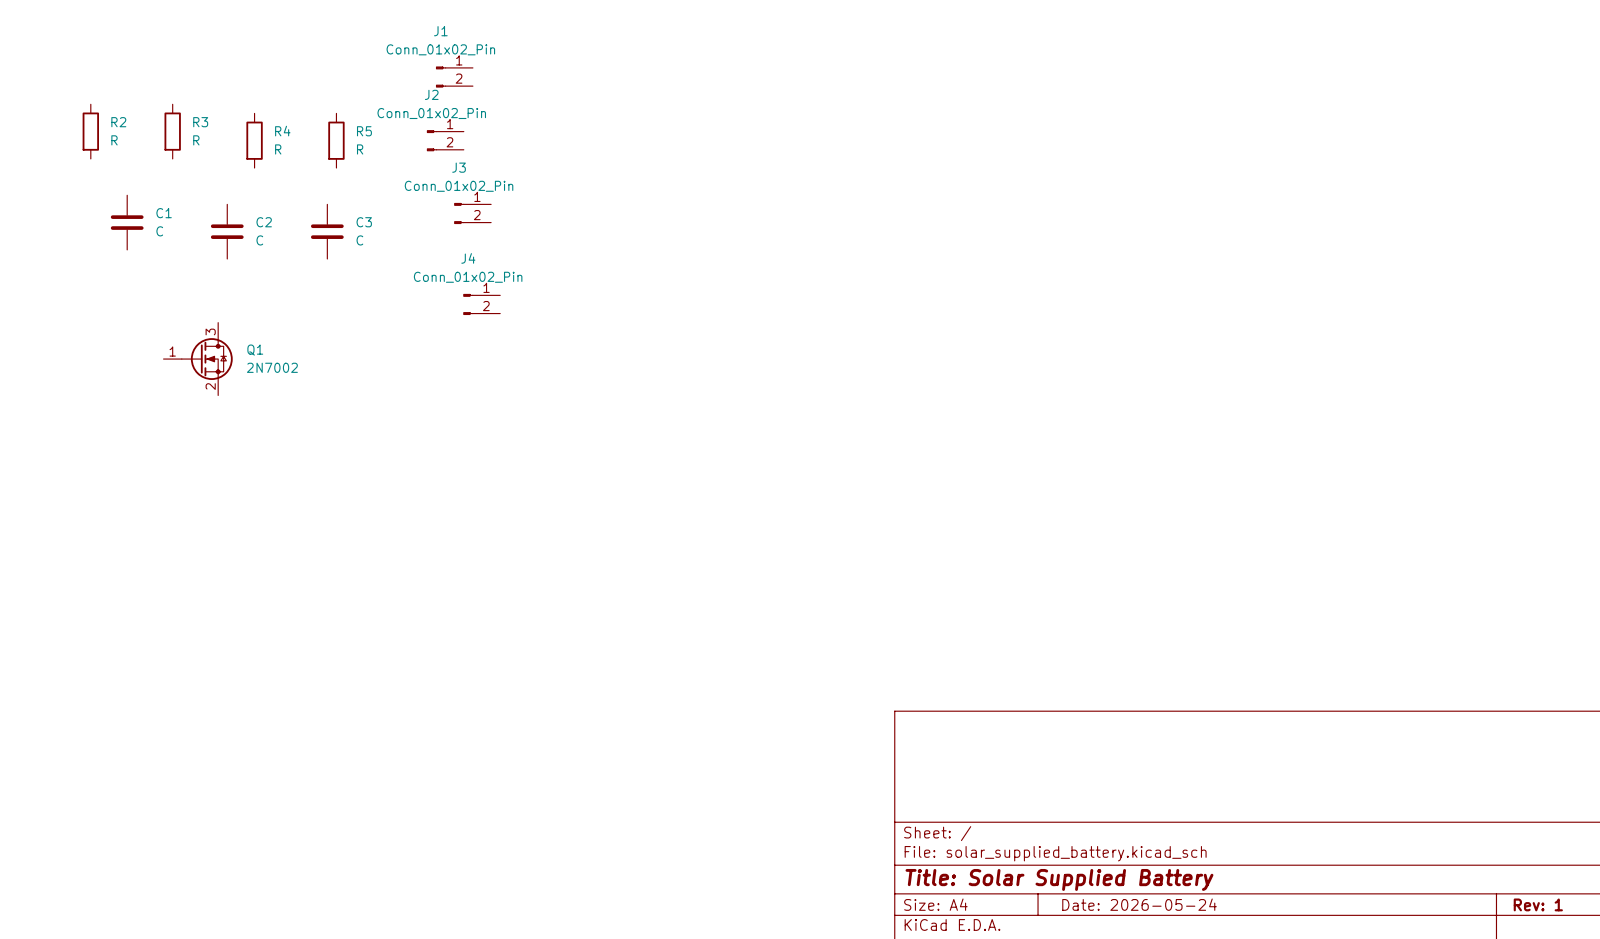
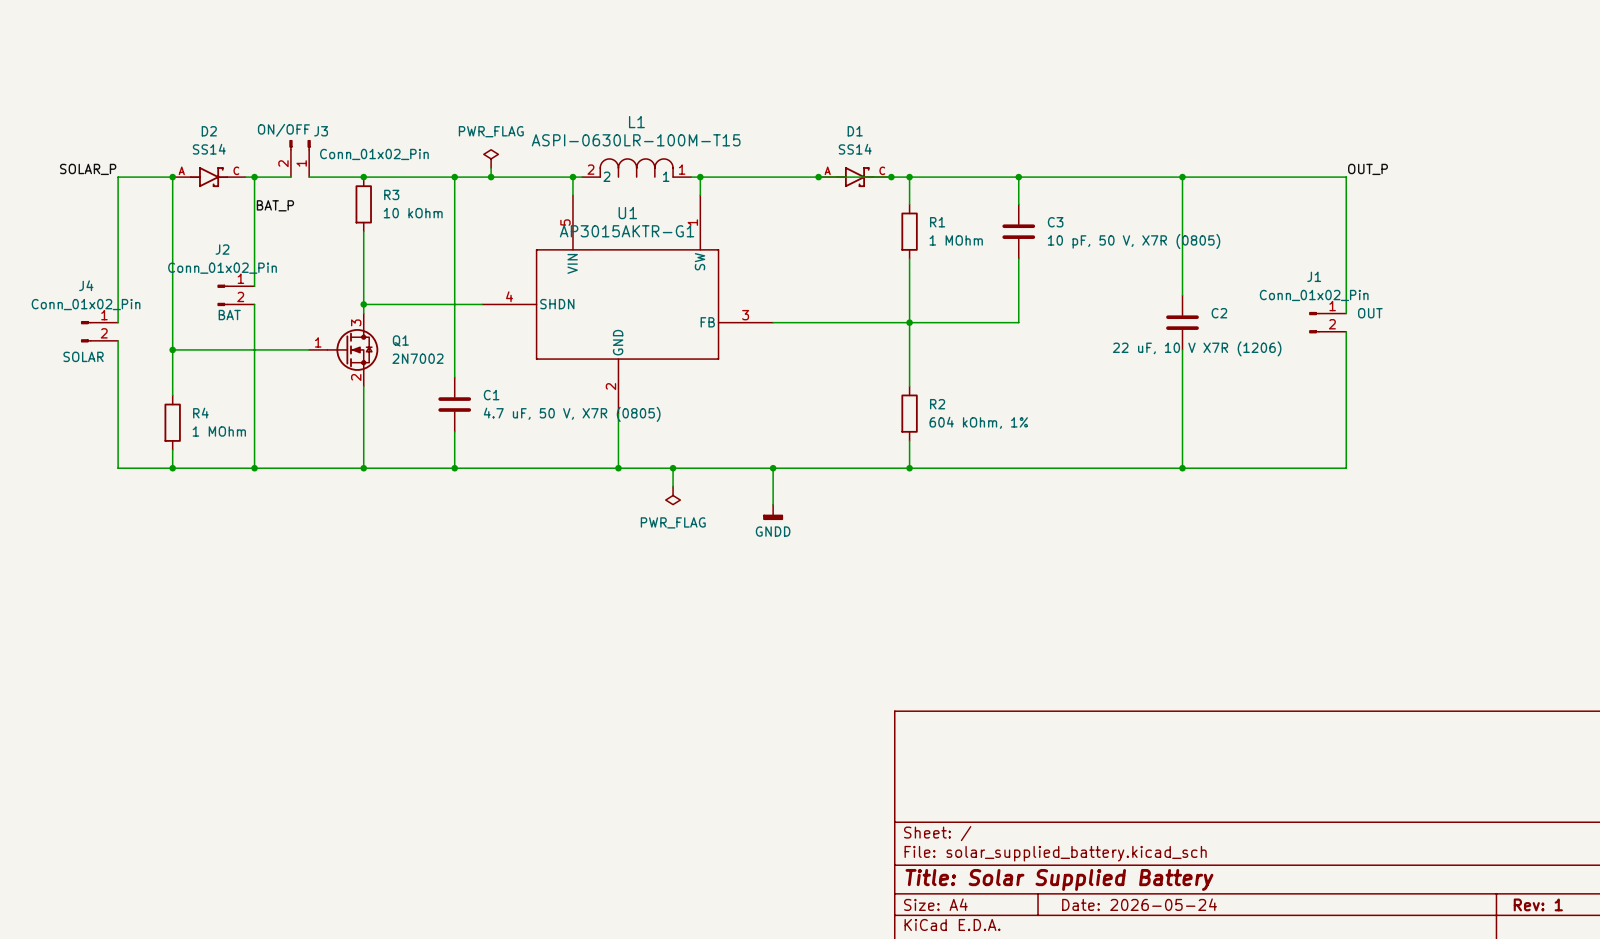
J1 position: (454, 77) -> (1327, 322)
J3 text: none -> ON/OFF (283, 130)
R2 position: (90, 131) -> (909, 413)
R3 position: (172, 131) -> (363, 204)
R2 value: R (114, 140) -> 604 kOhm, 1% (978, 422)
R3 value: R (196, 140) -> 10 kOhm (413, 213)
R4 position: (254, 140) -> (172, 422)
R5: R (336, 140) -> none
J2 position: (445, 140) -> (236, 295)
R4 value: R (278, 149) -> 1 MOhm (219, 431)
power symbol: none -> PWR_FLAG (491, 158)
J3 name position: J3 (459, 167) -> J3 (321, 131)
wire: none -> (491, 168) (491, 177)
L1: none -> ASPI-0630LR-100M-T15 (636, 168)
label: none -> SOLAR_P (88, 169)
label: none -> OUT_P (1367, 169)
junction: none -> (172, 177)
D2: none -> SS14 (209, 177)
wire: none -> (245, 177) (290, 177)
wire: none -> (254, 177) (254, 286)
junction: none -> (254, 177)
wire: none -> (309, 177) (582, 177)
junction: none -> (363, 177)
wire: none -> (454, 177) (454, 377)
junction: none -> (454, 177)
junction: none -> (491, 177)
wire: none -> (572, 177) (572, 195)
junction: none -> (572, 177)
wire: none -> (691, 177) (1346, 177) (1346, 313)
wire: none -> (700, 177) (700, 195)
junction: none -> (700, 177)
junction: none -> (818, 177)
D1: none -> SS14 (854, 177)
junction: none -> (891, 177)
wire: none -> (909, 177) (909, 204)
junction: none -> (909, 177)
wire: none -> (1018, 177) (1018, 204)
junction: none -> (1018, 177)
wire: none -> (1182, 177) (1182, 295)
junction: none -> (1182, 177)
J3 value position: Conn_01x02_Pin (459, 186) -> Conn_01x02_Pin (374, 154)
label: none -> BAT_P (275, 205)
J3 rotation: 0° (459, 213) -> 90° clockwise (300, 145)
J3 position: (472, 213) -> (300, 158)
C1 position: (127, 222) -> (454, 404)
C1 value: C (159, 231) -> 4.7 uF, 50 V, X7R (0805) (572, 414)
C2 position: (227, 231) -> (1182, 322)
C3 position: (327, 231) -> (1018, 231)
wire: none -> (363, 231) (363, 313)
R1: none -> 1 MOhm (909, 231)
C2 value: C (259, 240) -> 22 uF, 10 V X7R (1206) (1197, 348)
C3 value: C (359, 240) -> 10 pF, 50 V, X7R (0805) (1134, 241)
wire: none -> (909, 258) (909, 386)
wire: none -> (1018, 258) (1018, 322) (773, 322)
wire: none -> (254, 304) (254, 468)
wire: none -> (363, 304) (482, 304)
junction: none -> (363, 304)
J4 position: (481, 304) -> (99, 331)
U1: none -> AP3015AKTR-G1 (627, 304)
J1 text: none -> OUT (1370, 313)
J2 text: none -> BAT (229, 315)
wire: none -> (118, 322) (118, 177) (172, 177) (172, 395)
junction: none -> (909, 322)
wire: none -> (1346, 331) (1346, 468) (118, 468) (118, 340)
wire: none -> (172, 349) (309, 349)
junction: none -> (172, 349)
wire: none -> (1182, 349) (1182, 468)
J4 text: none -> SOLAR (83, 356)
Q1 position: (198, 359) -> (343, 349)
wire: none -> (363, 386) (363, 468)
wire: none -> (618, 413) (618, 468)
wire: none -> (454, 431) (454, 468)
wire: none -> (909, 440) (909, 468)
wire: none -> (172, 450) (172, 468)
junction: none -> (172, 468)
junction: none -> (254, 468)
junction: none -> (363, 468)
junction: none -> (454, 468)
junction: none -> (618, 468)
wire: none -> (673, 468) (673, 486)
junction: none -> (673, 468)
wire: none -> (773, 468) (773, 504)
junction: none -> (773, 468)
junction: none -> (909, 468)
junction: none -> (1182, 468)
power symbol: none -> PWR_FLAG (673, 495)
power symbol: none -> GNDD (773, 512)

